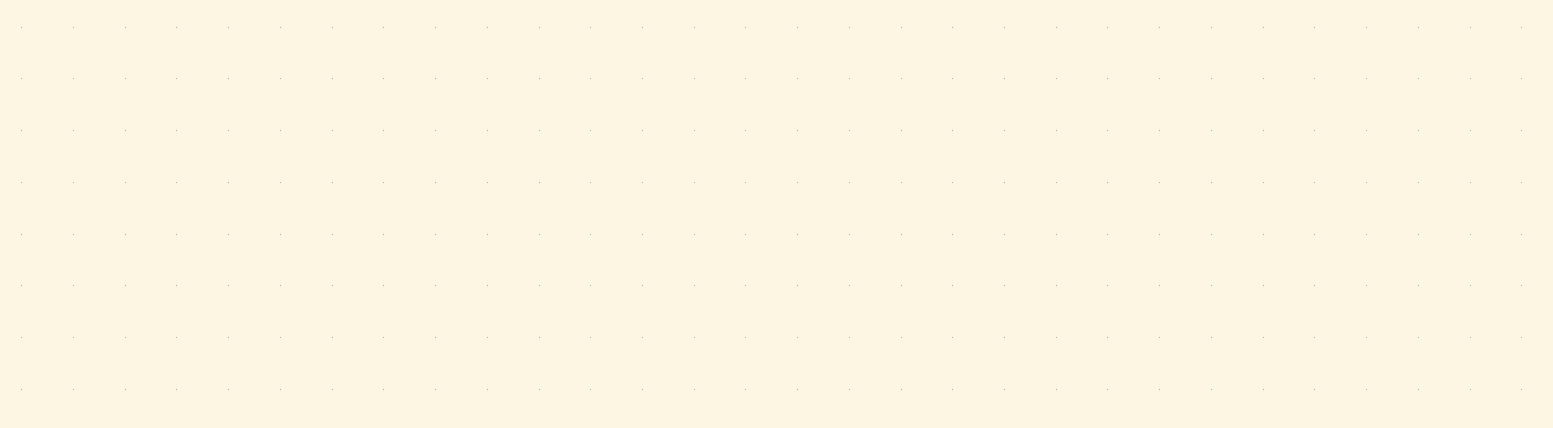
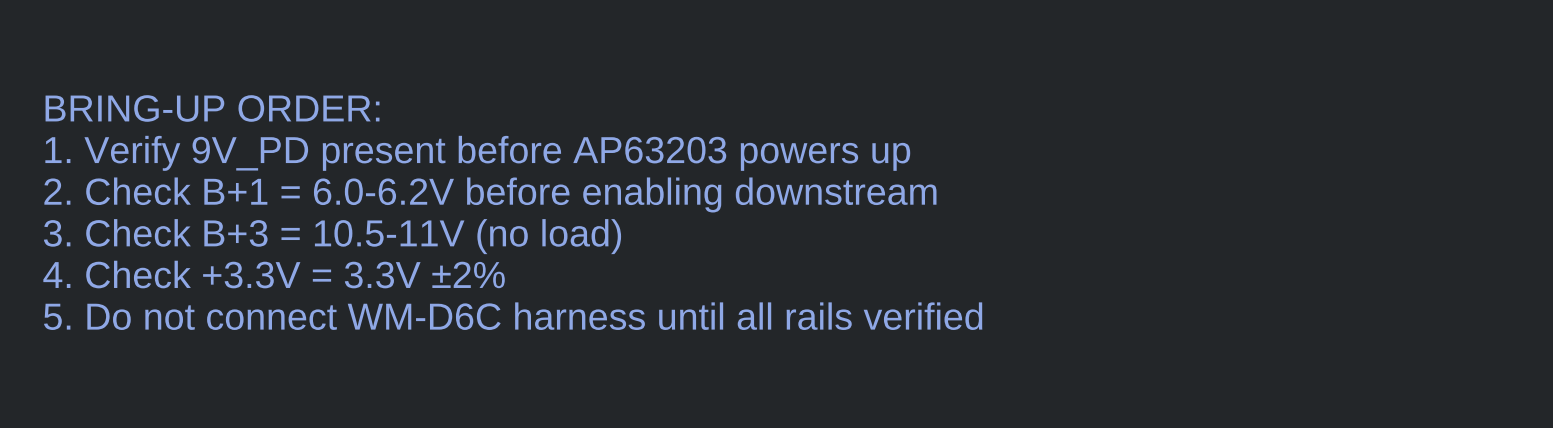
text: none -> BRING-UP ORDER: (212, 108)
text: none -> 1. Verify 9V_PD present before AP63203 powers up (477, 153)
text: none -> 2. Check B+1 = 6.0-6.2V before enabling downstream (490, 194)
text: none -> 3. Check B+3 = 10.5-11V (no load) (332, 236)
text: none -> 4. Check +3.3V = 3.3V ±2% (274, 274)
text: none -> 5. Do not connect WM-D6C harness until all rails verified (513, 316)

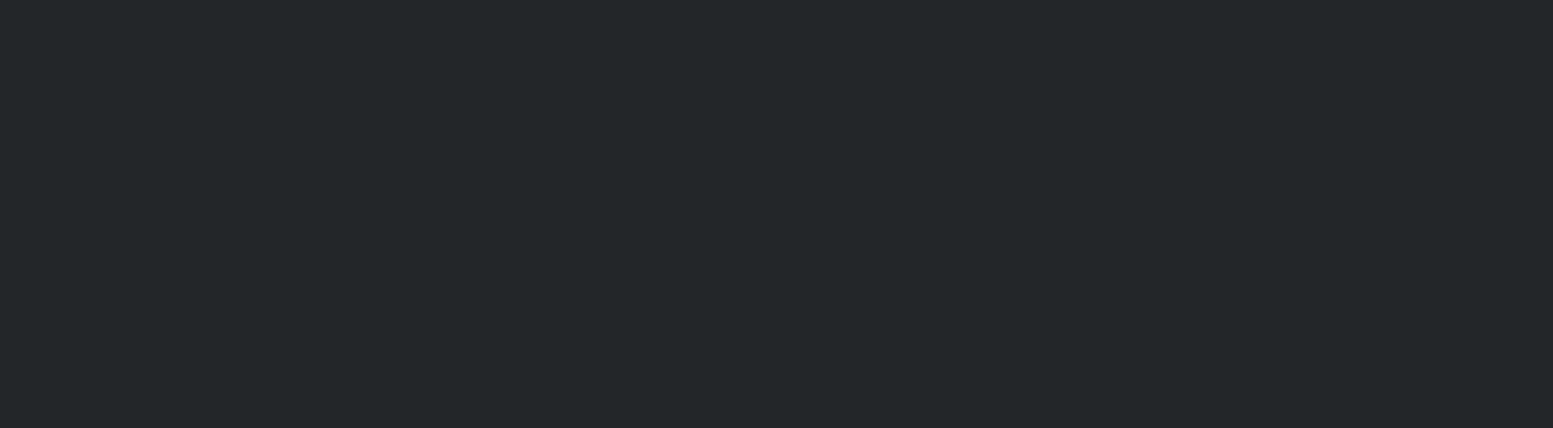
text: BRING-UP ORDER: (212, 108) -> none
text: 1. Verify 9V_PD present before AP63203 powers up (477, 153) -> none
text: 2. Check B+1 = 6.0-6.2V before enabling downstream (490, 194) -> none
text: 3. Check B+3 = 10.5-11V (no load) (332, 236) -> none
text: 4. Check +3.3V = 3.3V ±2% (274, 274) -> none
text: 5. Do not connect WM-D6C harness until all rails verified (513, 316) -> none

